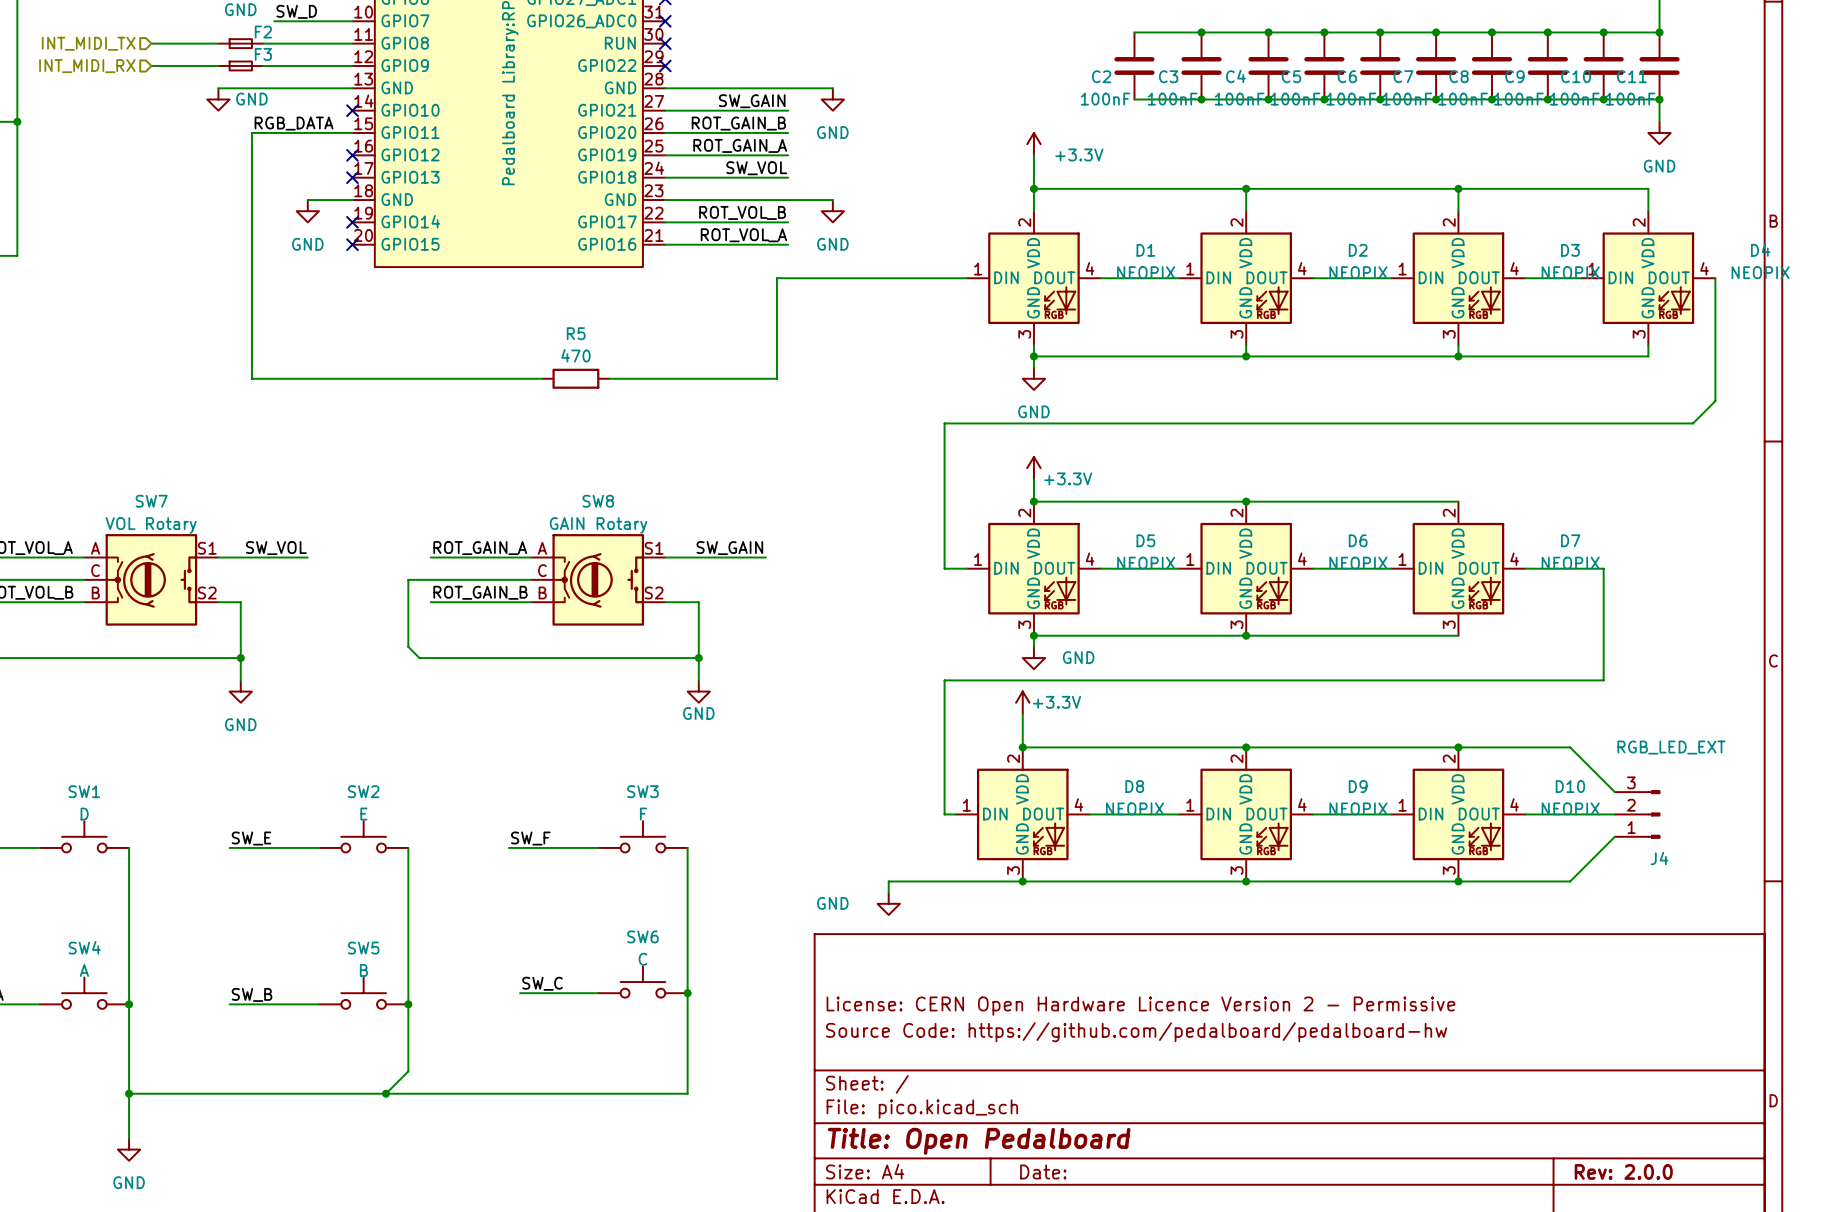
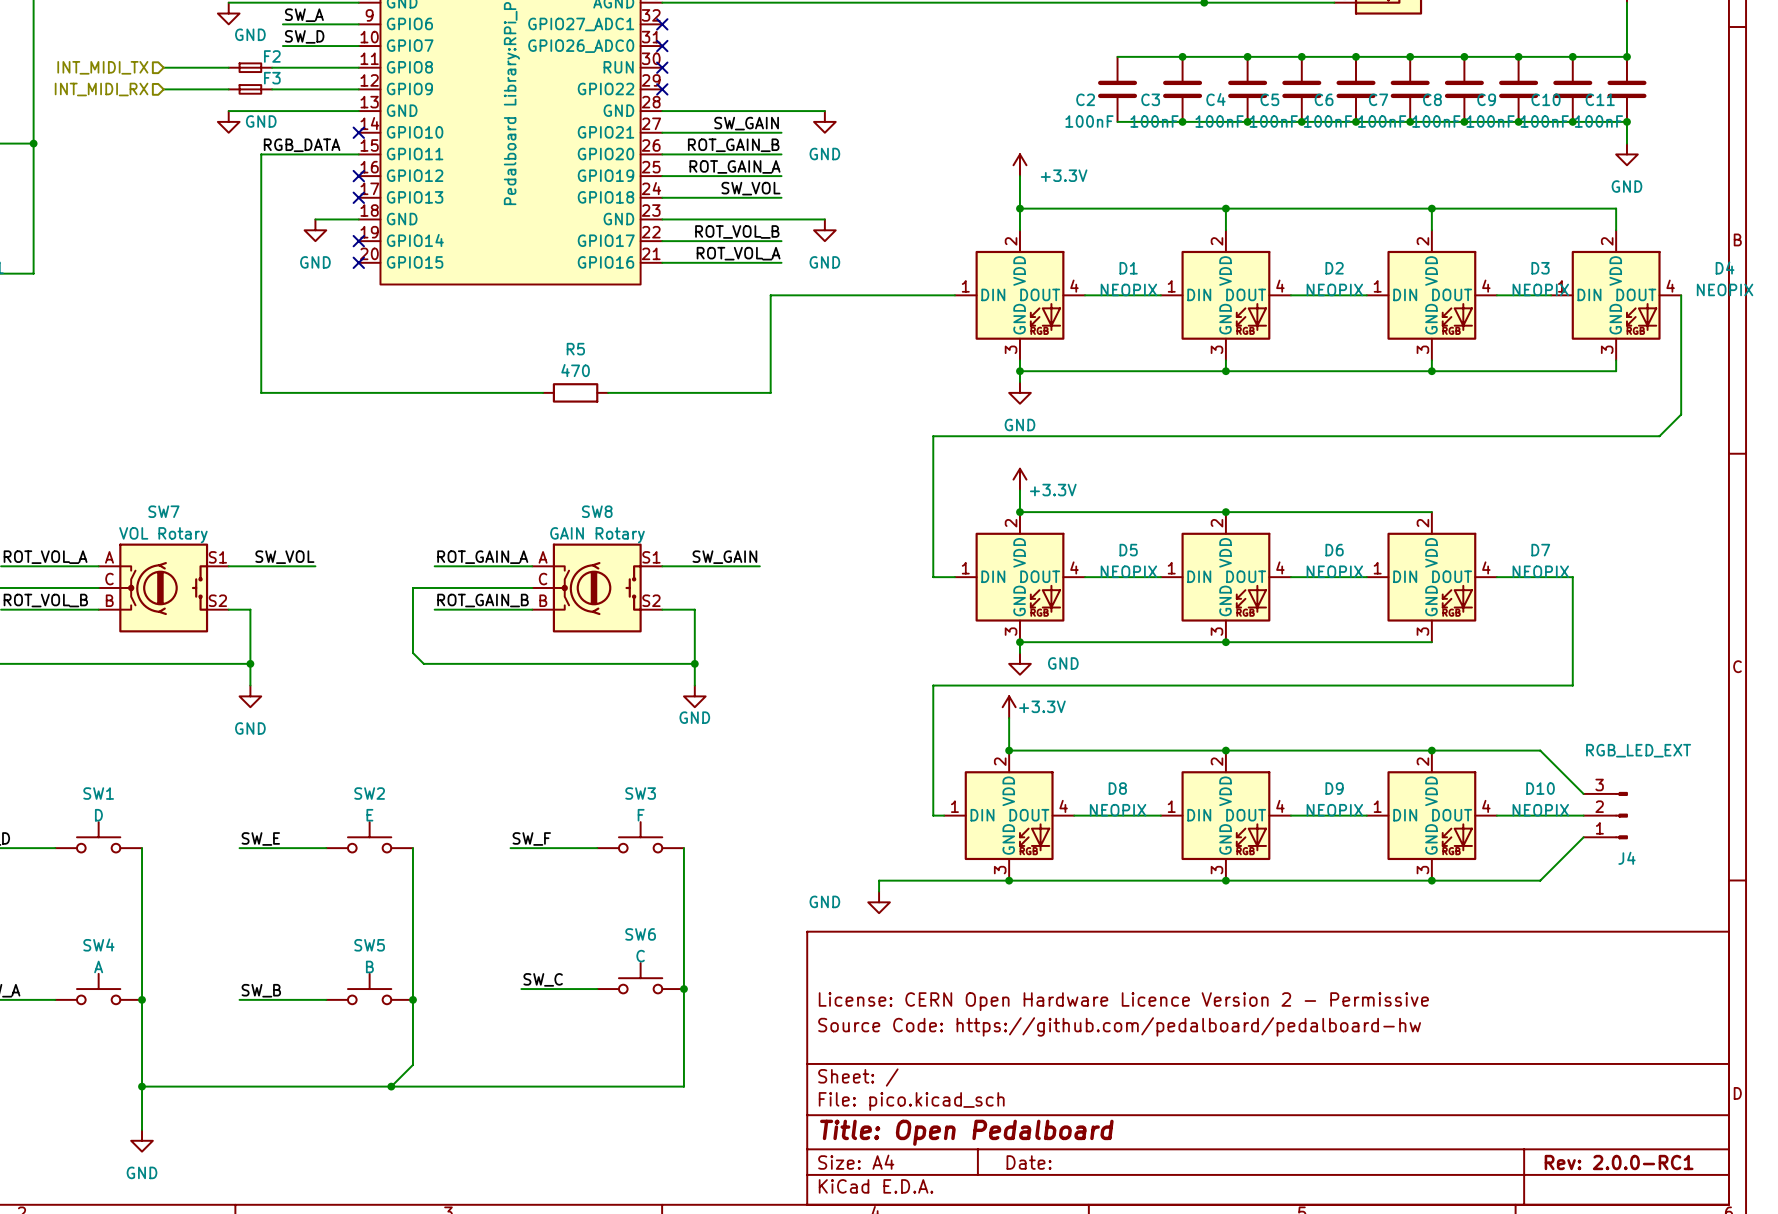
title block: Rev: 2.0.0 (1623, 1171) -> Rev: 2.0.0-RC1 (1619, 1162)

